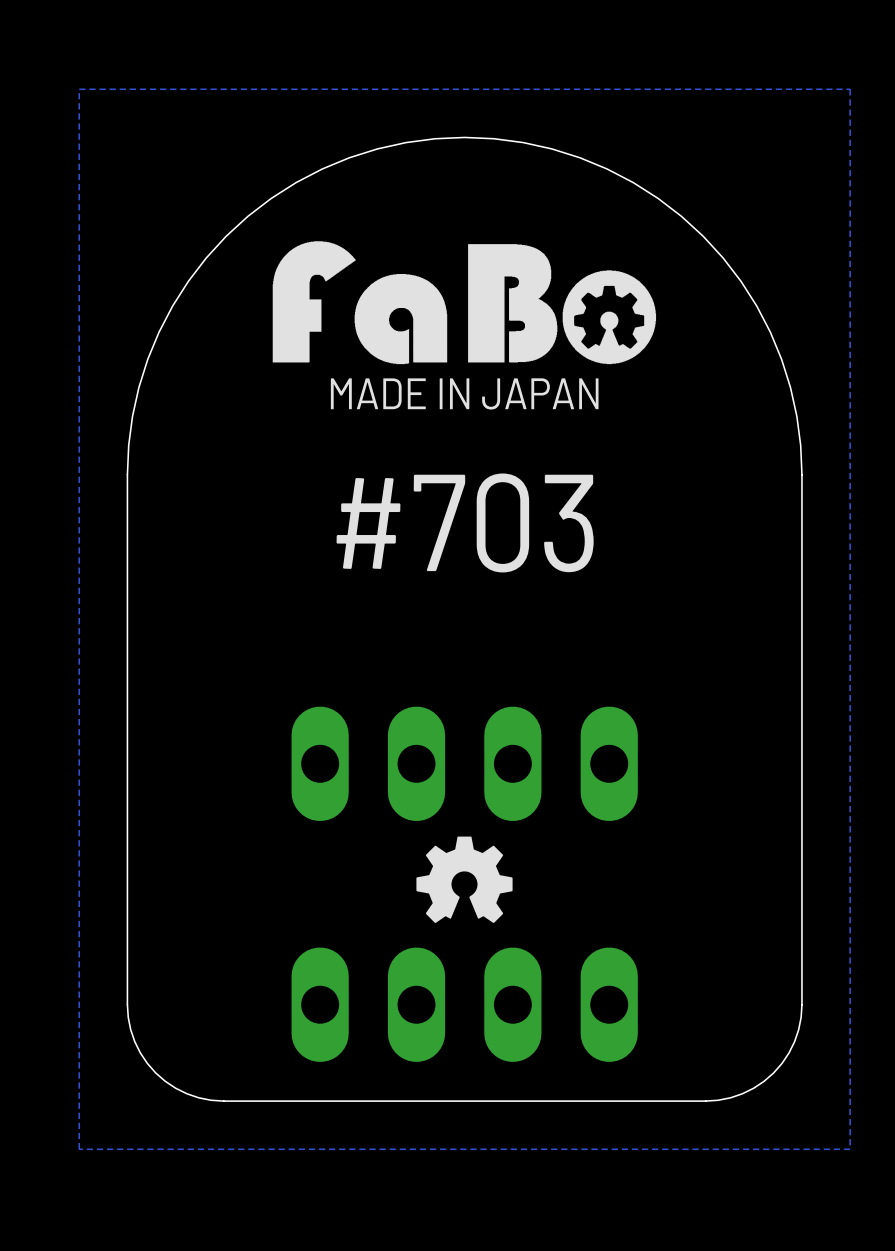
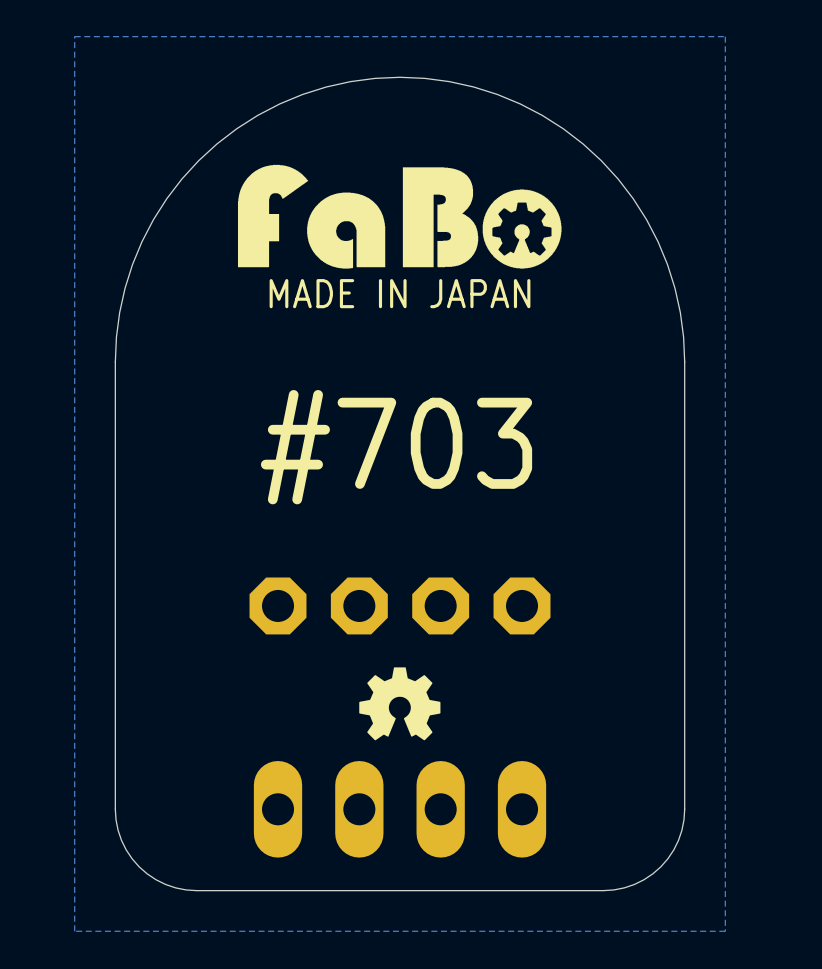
text position: #703 (465, 522) -> #703 (396, 447)
part footprint: [291, 706, 638, 822] -> [249, 577, 551, 635]

